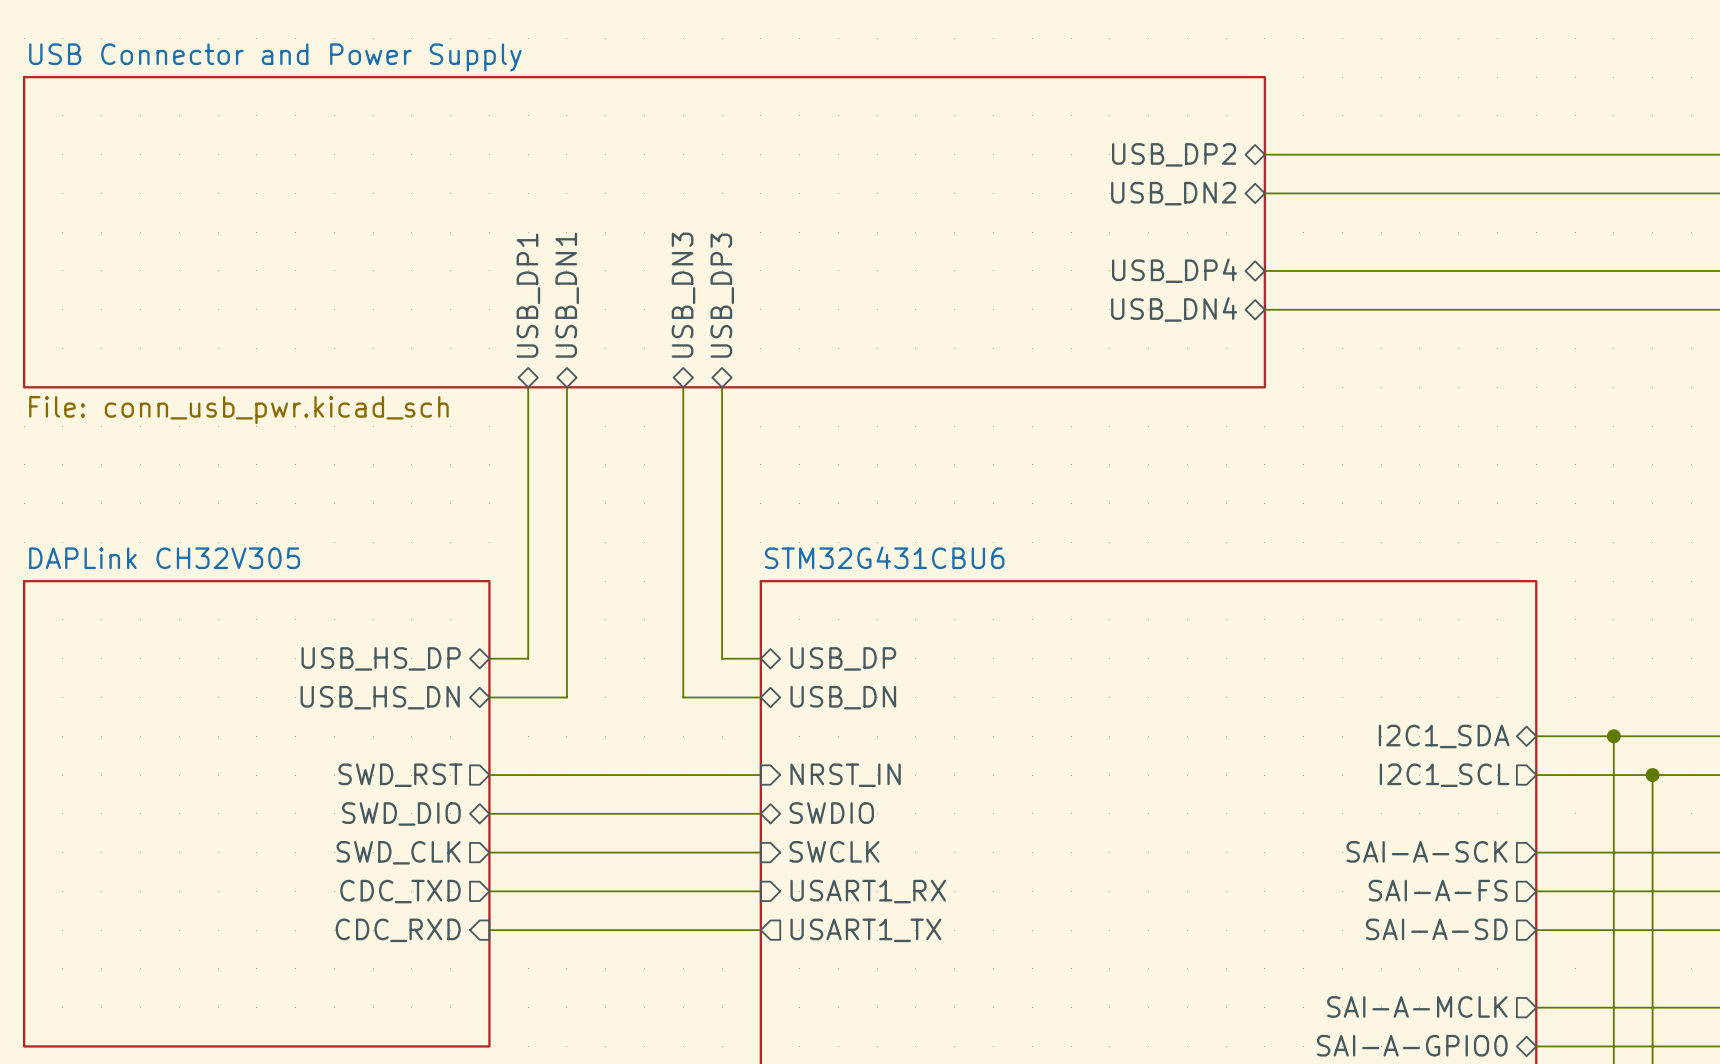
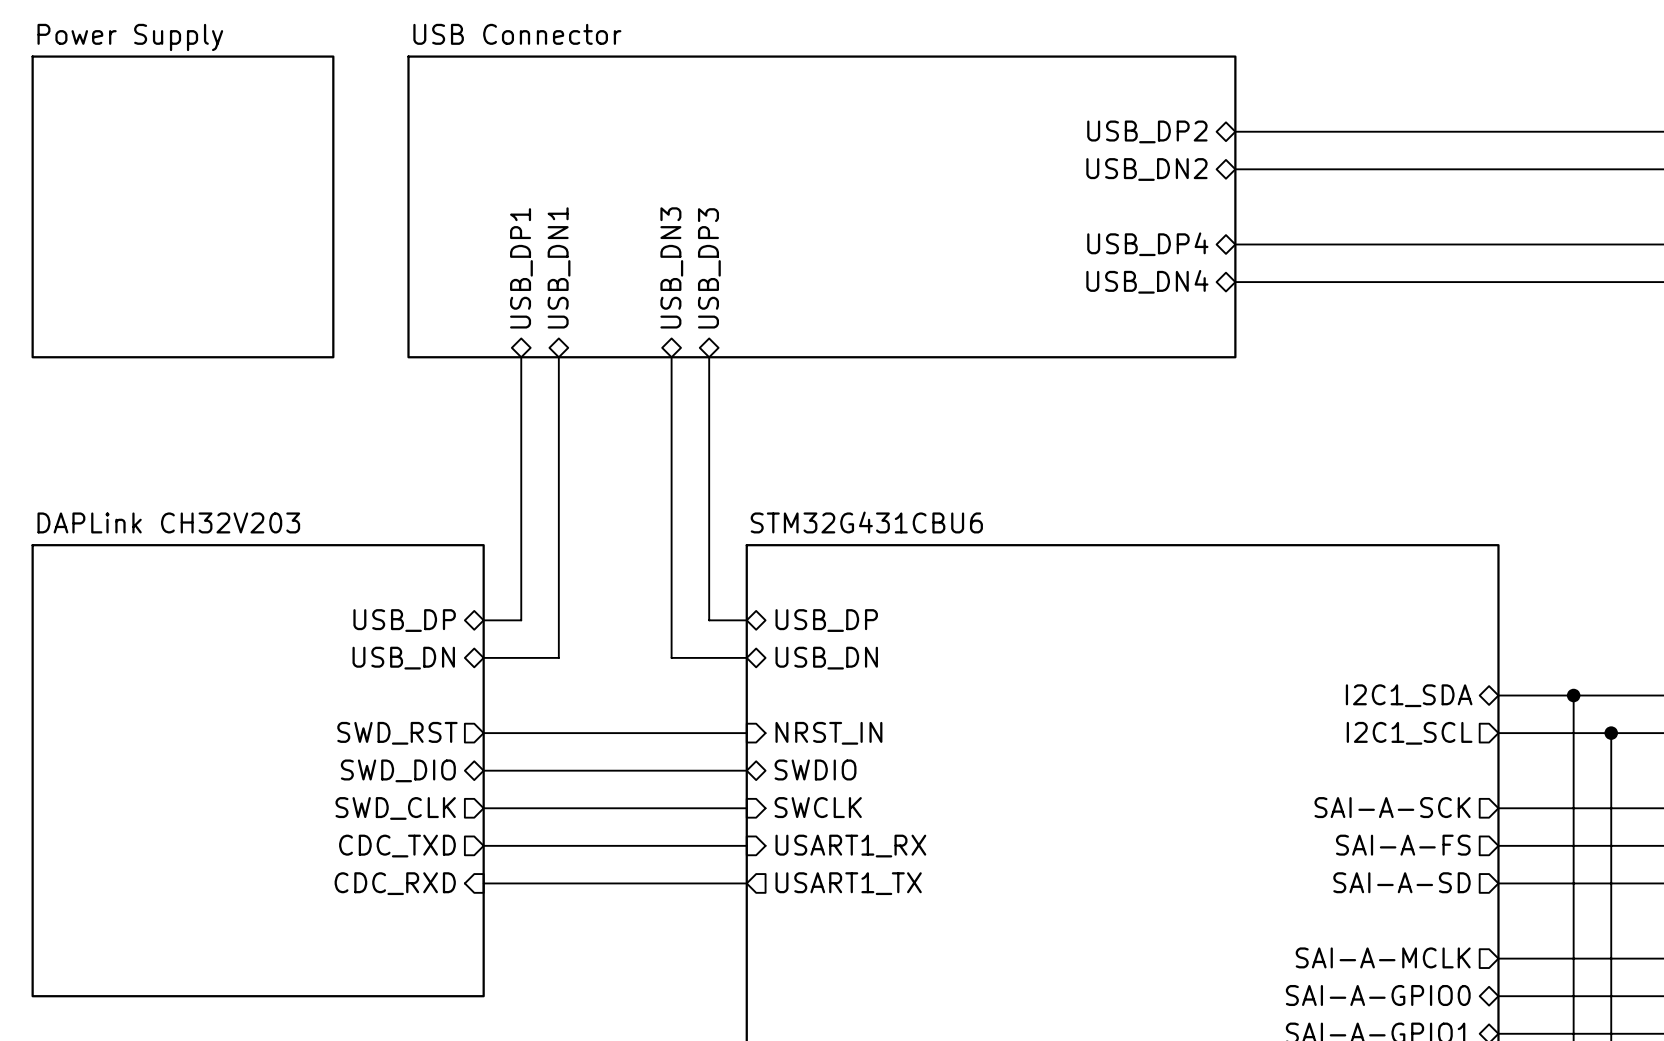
sheet Power Supply: none -> (182, 206)
sheet USB Connector and Power Supply: File: conn_usb_pwr.kicad_sch (644, 232) -> none
sheet USB Connector: none -> (821, 206)
sheet DAPLink CH32V305 name: DAPLink CH32V305 (164, 558) -> DAPLink CH32V203 (168, 522)
sheet pin: USB_HS_DP (381, 658) -> USB_DP (404, 620)
sheet pin: USB_HS_DN (380, 697) -> USB_DN (403, 658)

